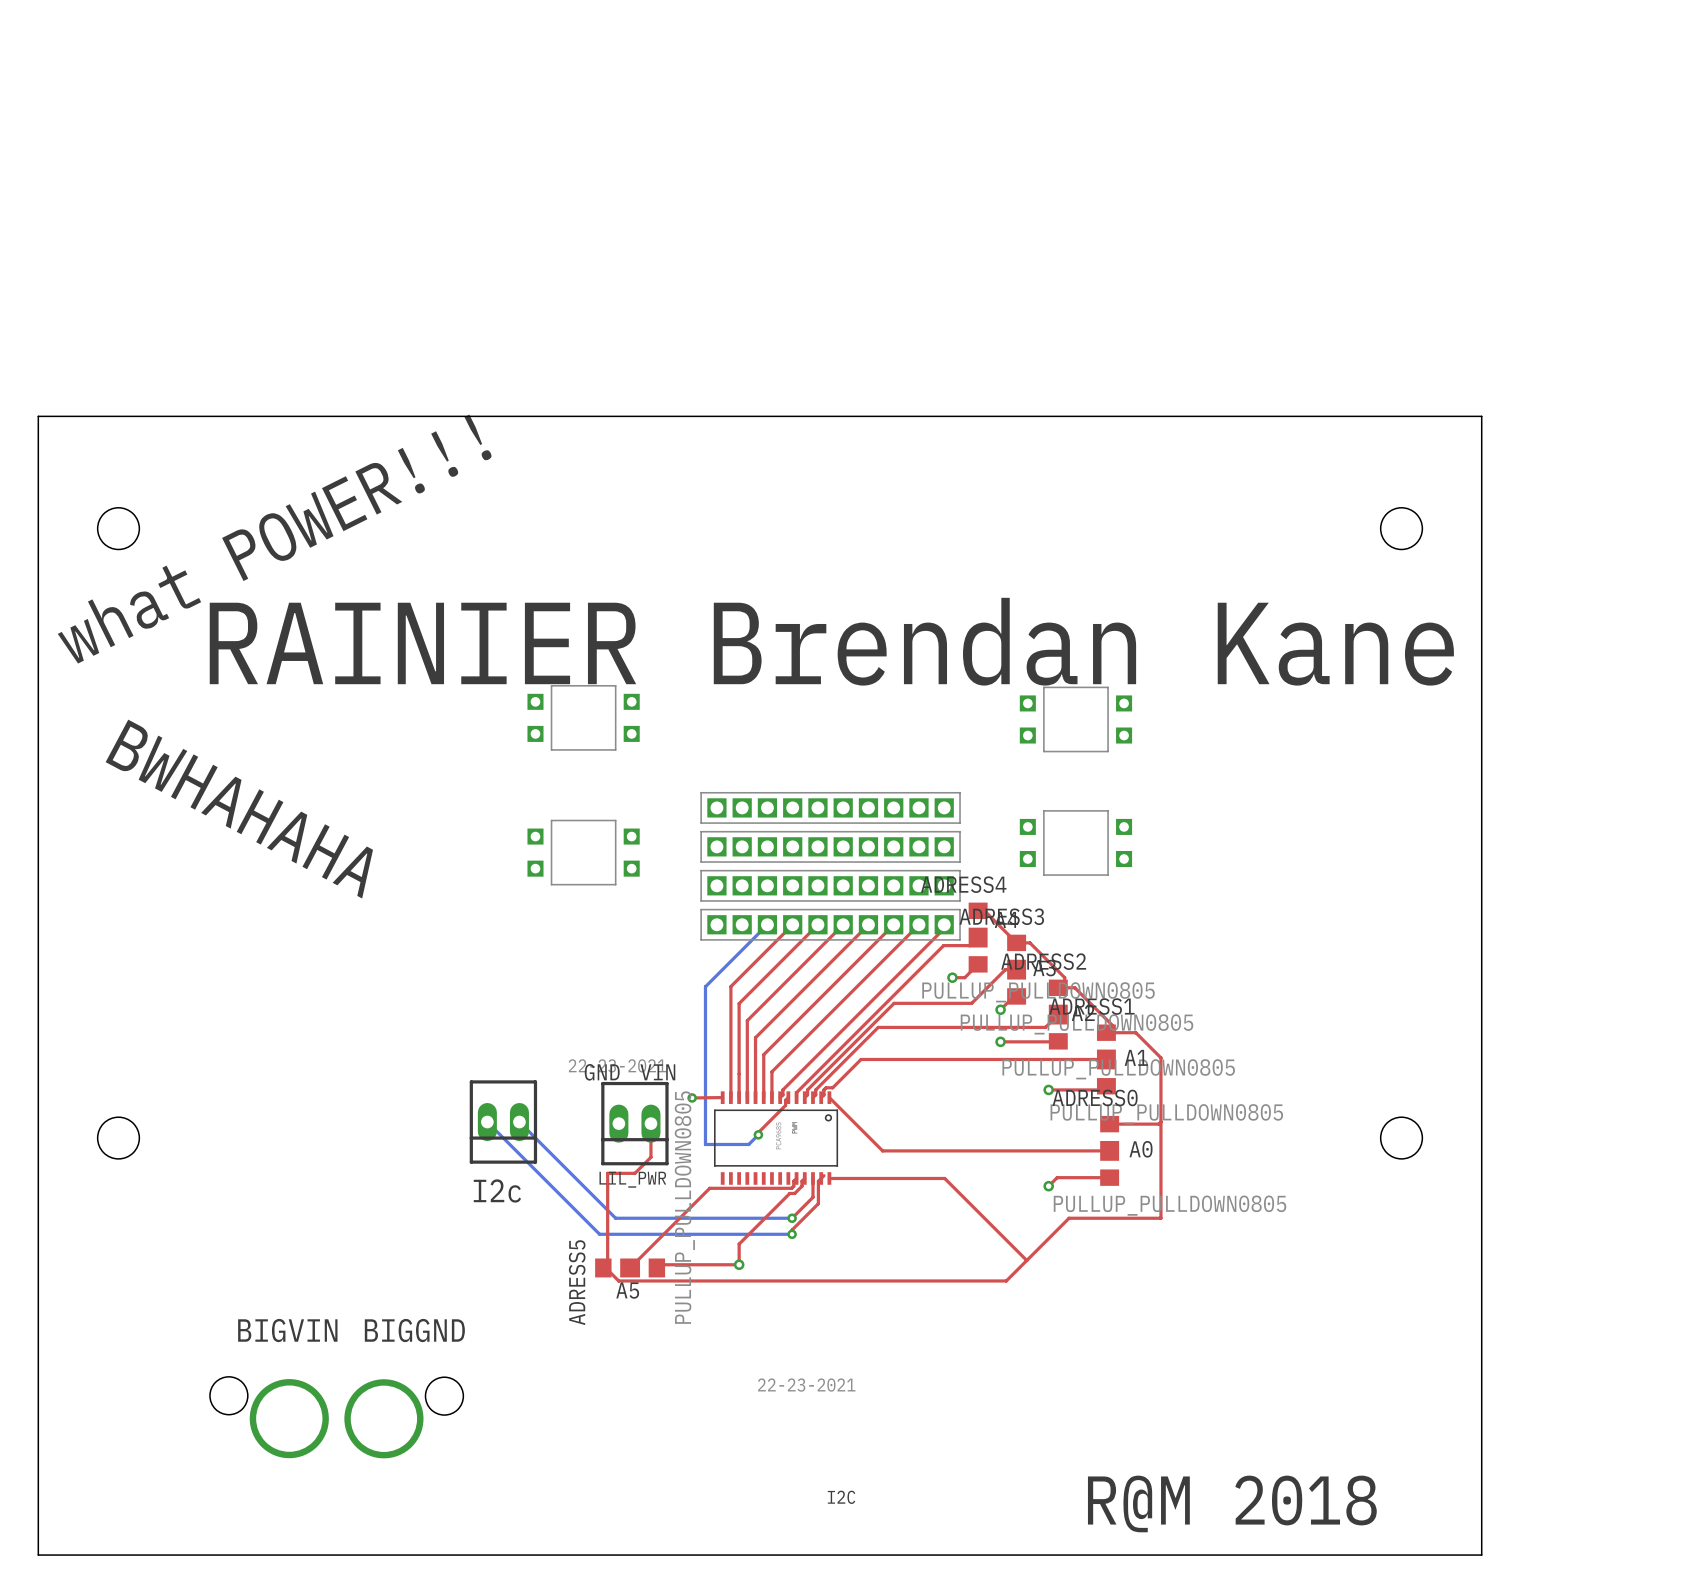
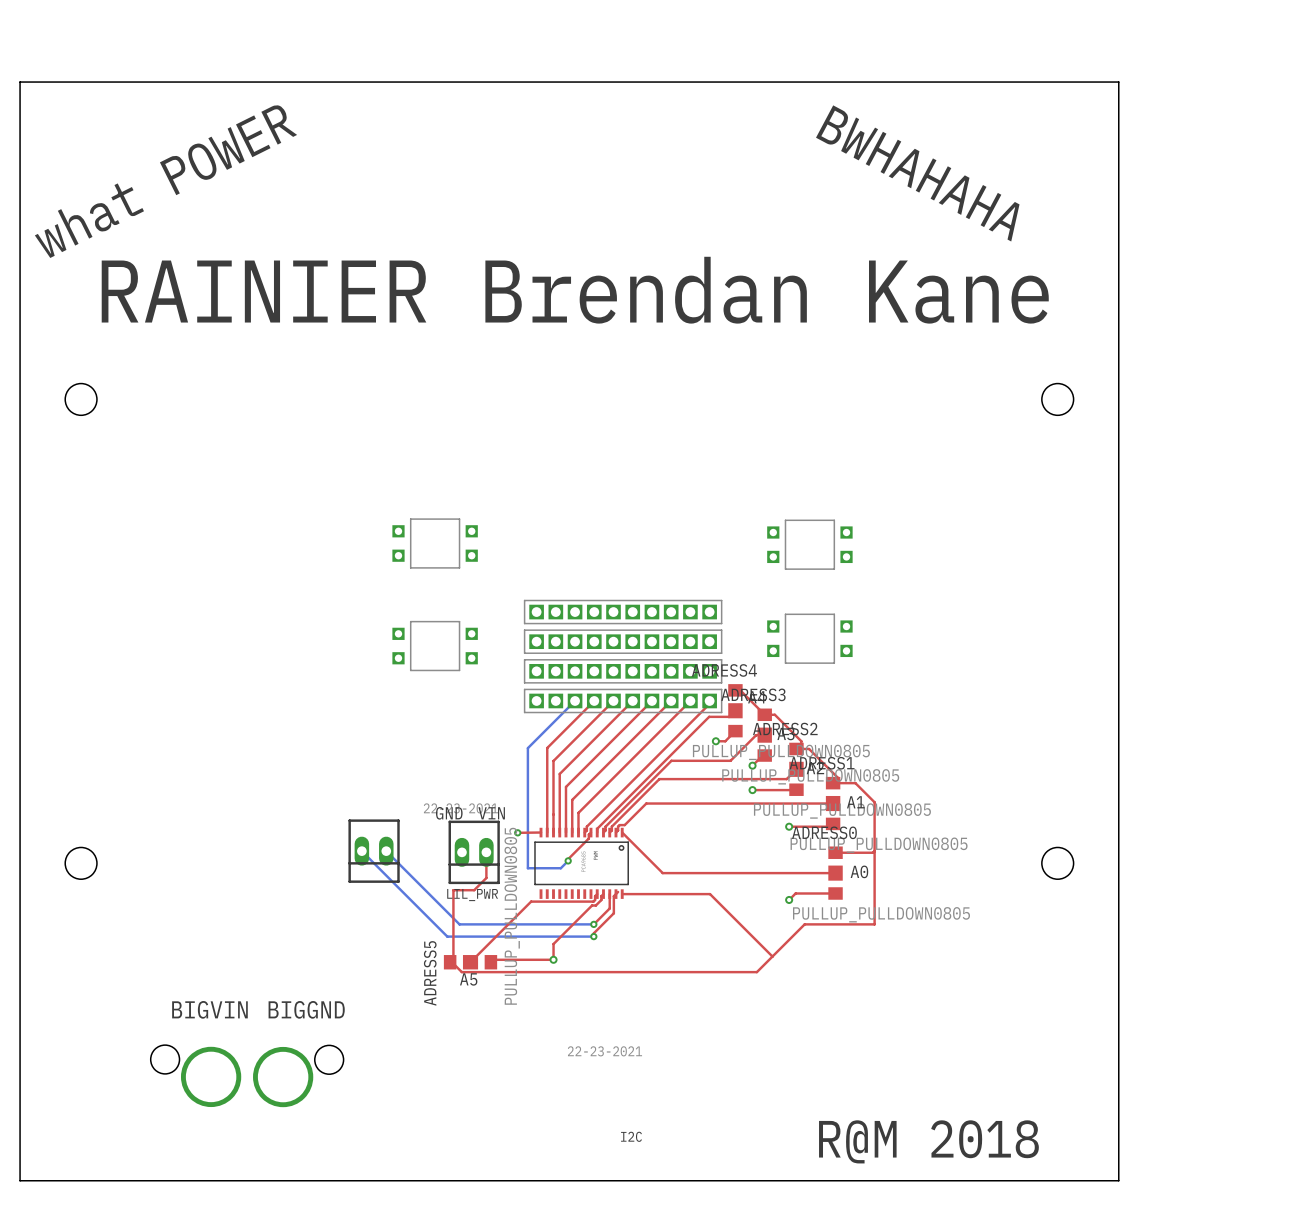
text: none -> BWHAHAHA (917, 173)
text: none -> what POWER (165, 181)
board edge: (38, 416) (1481, 416) -> (20, 313) (20, 82) (1118, 82) (1118, 313)
text: what POWER!!! (274, 539) -> none
text position: RAINIER Brendan Kane (831, 641) -> RAINIER Brendan Kane (575, 290)
text: BWHAHAHA (239, 809) -> none
text: I2c (497, 1190) -> none

